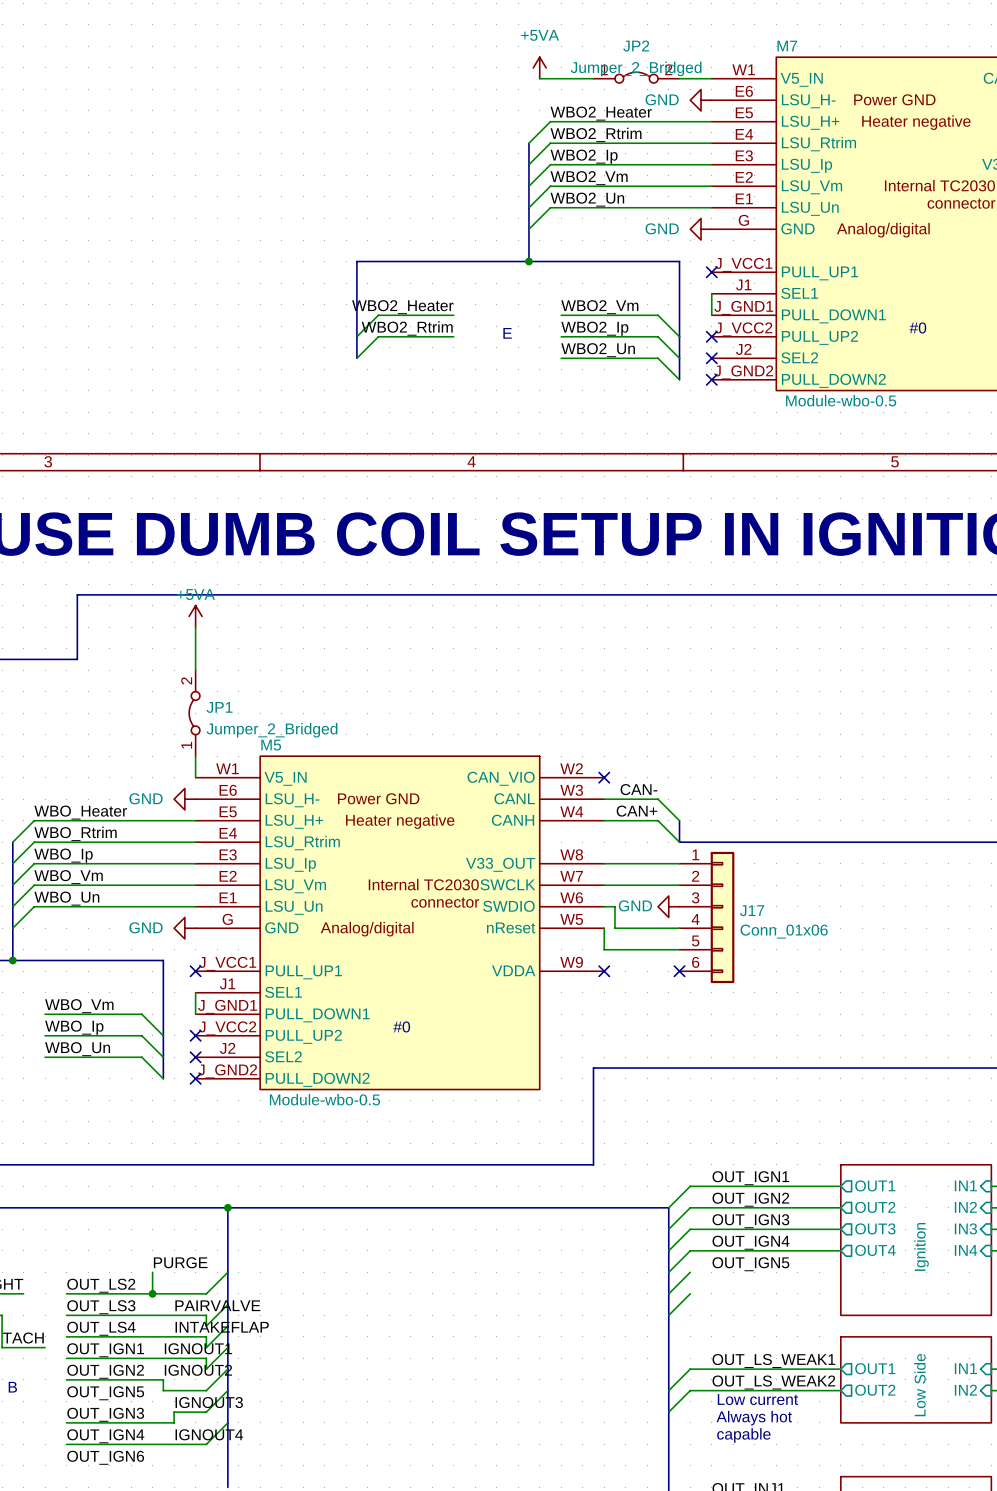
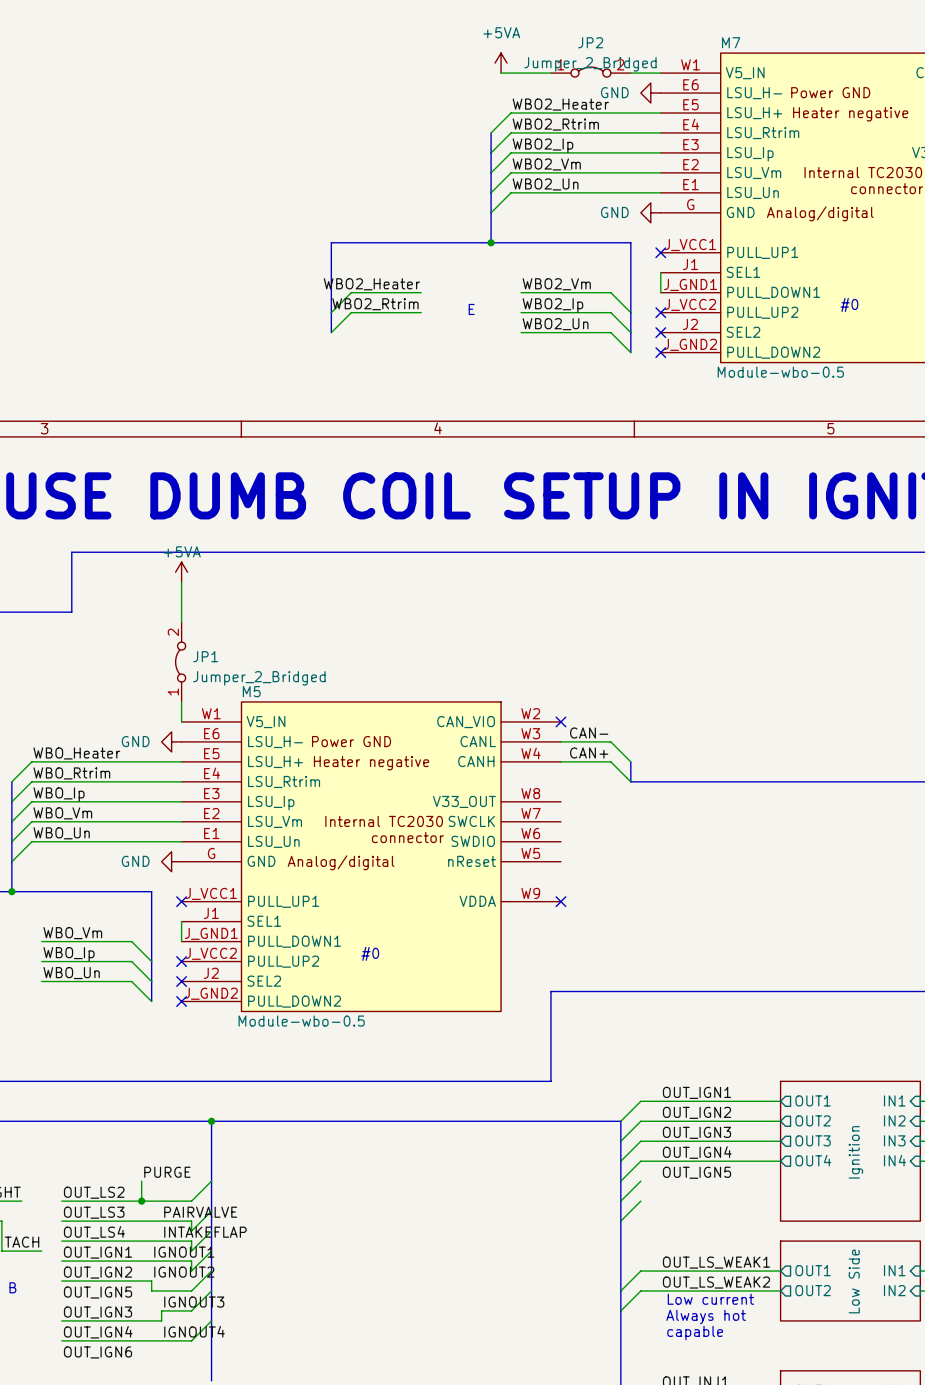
wire: (604, 863) (679, 863) -> none
wire: (604, 885) (679, 885) -> none
wire: (604, 906) (615, 906) (615, 928) (679, 928) -> none
power symbol: GND (668, 906) -> none
J17: Conn_01x06 (706, 917) -> none
wire: (604, 928) (604, 949) (679, 949) -> none
no-connect mark: (679, 971) -> none

